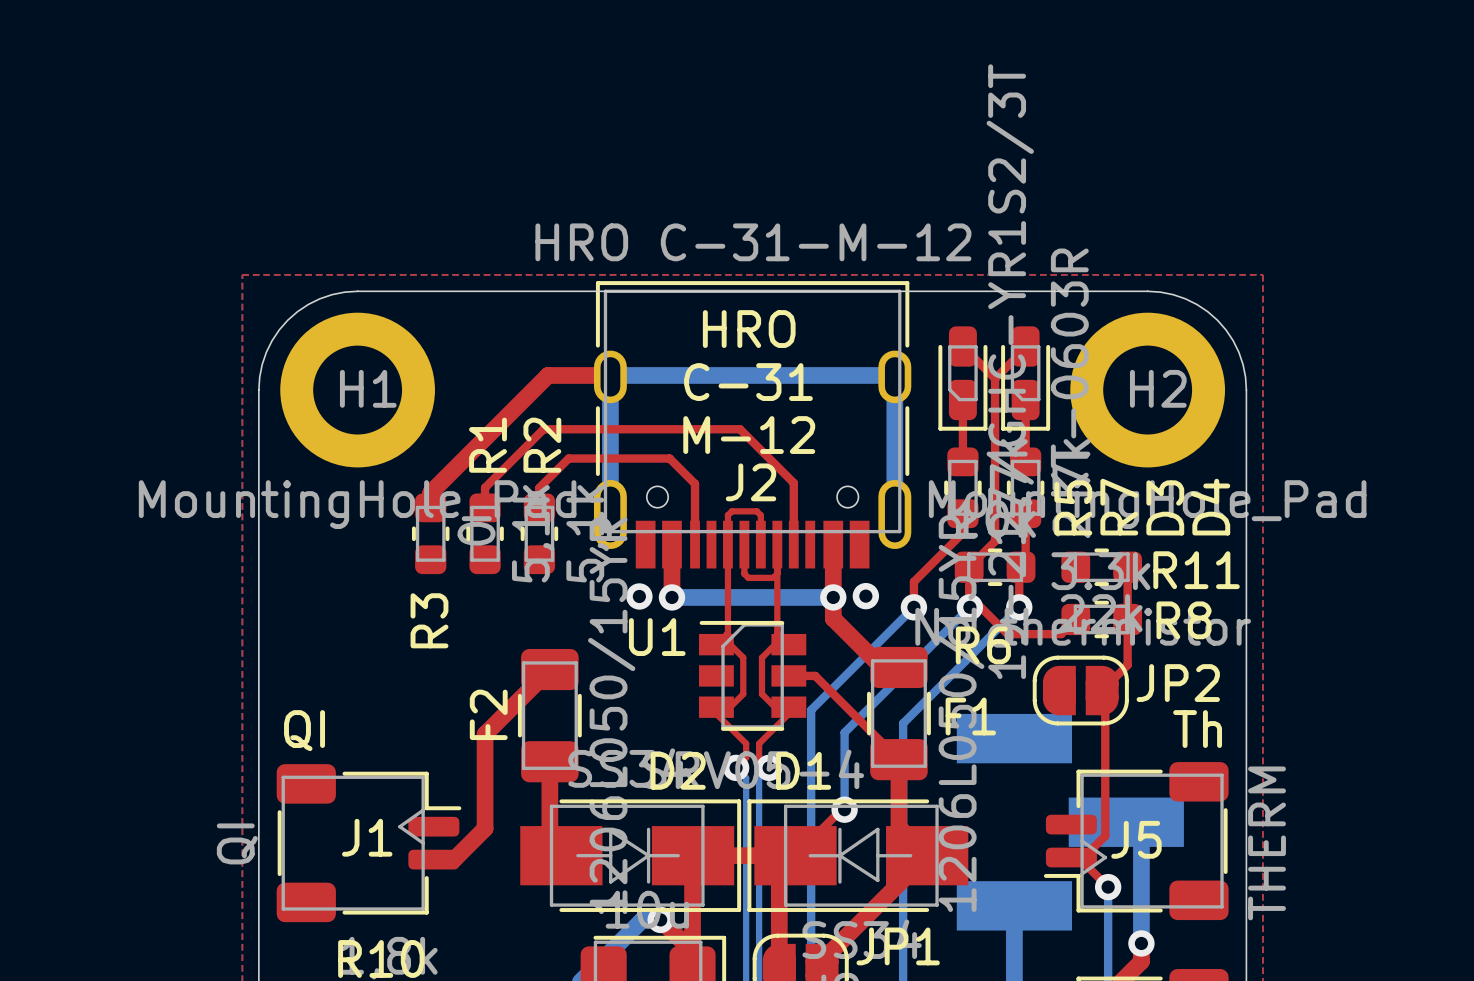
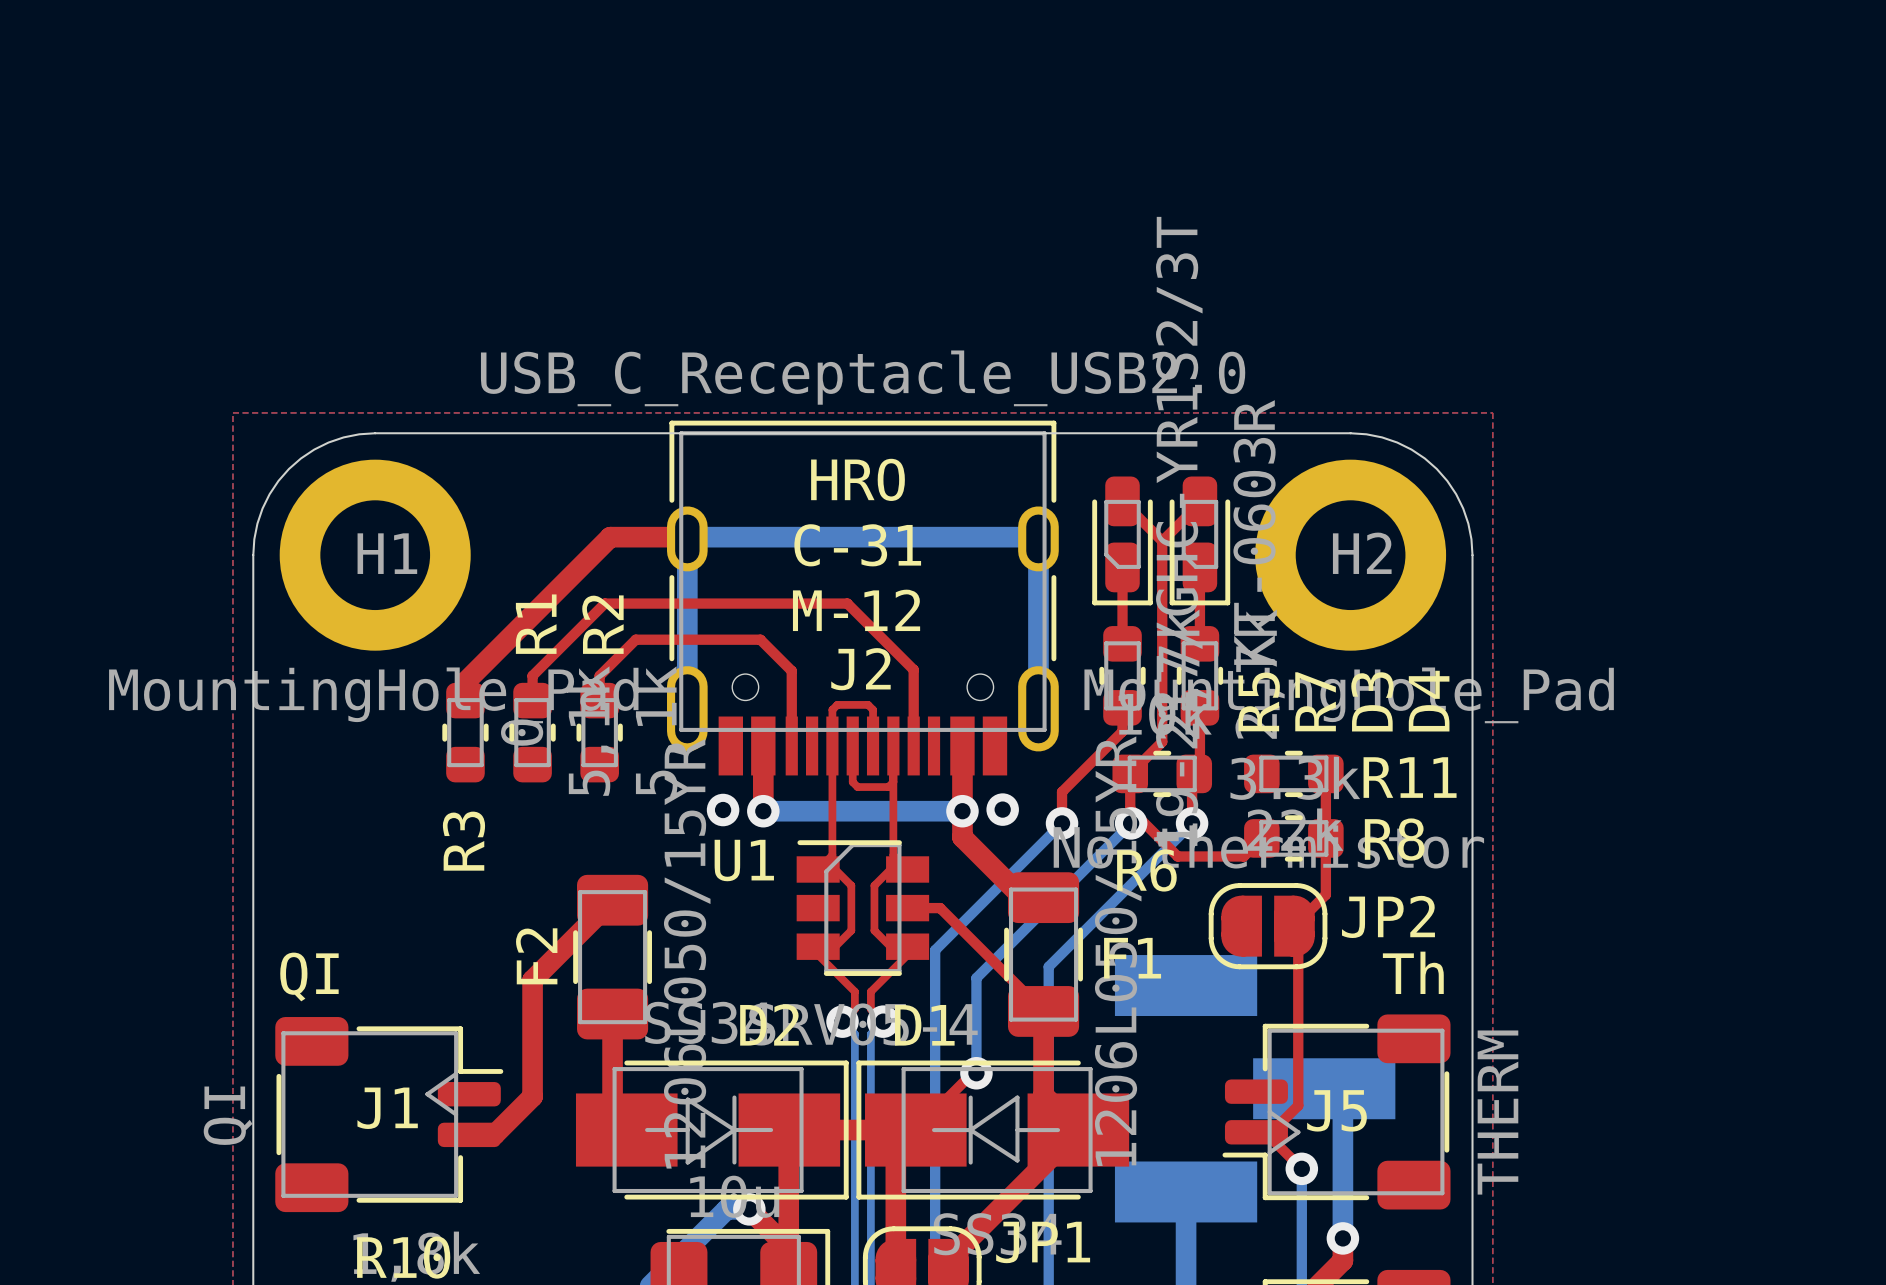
J2 value: HRO C-31-M-12 (753, 242) -> USB_C_Receptacle_USB2.0 (863, 378)

